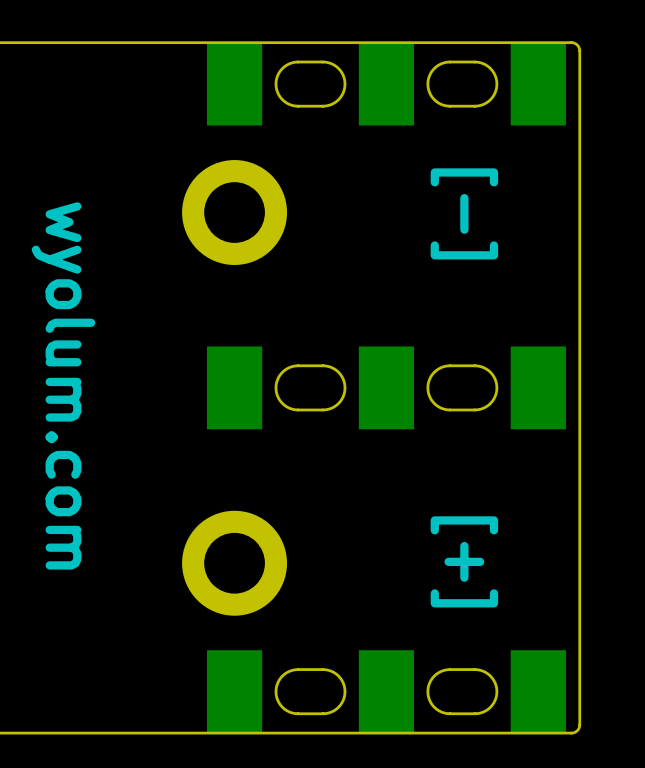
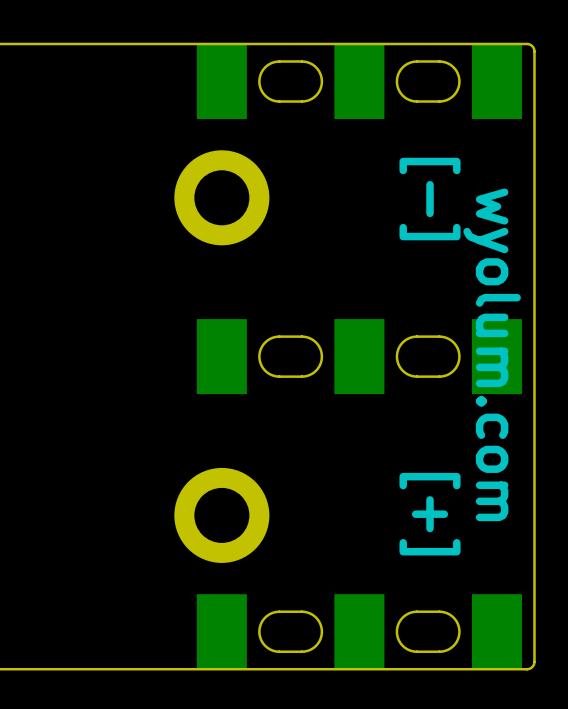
text position: wyolum.com (63, 385) -> wyolum.com (492, 354)

